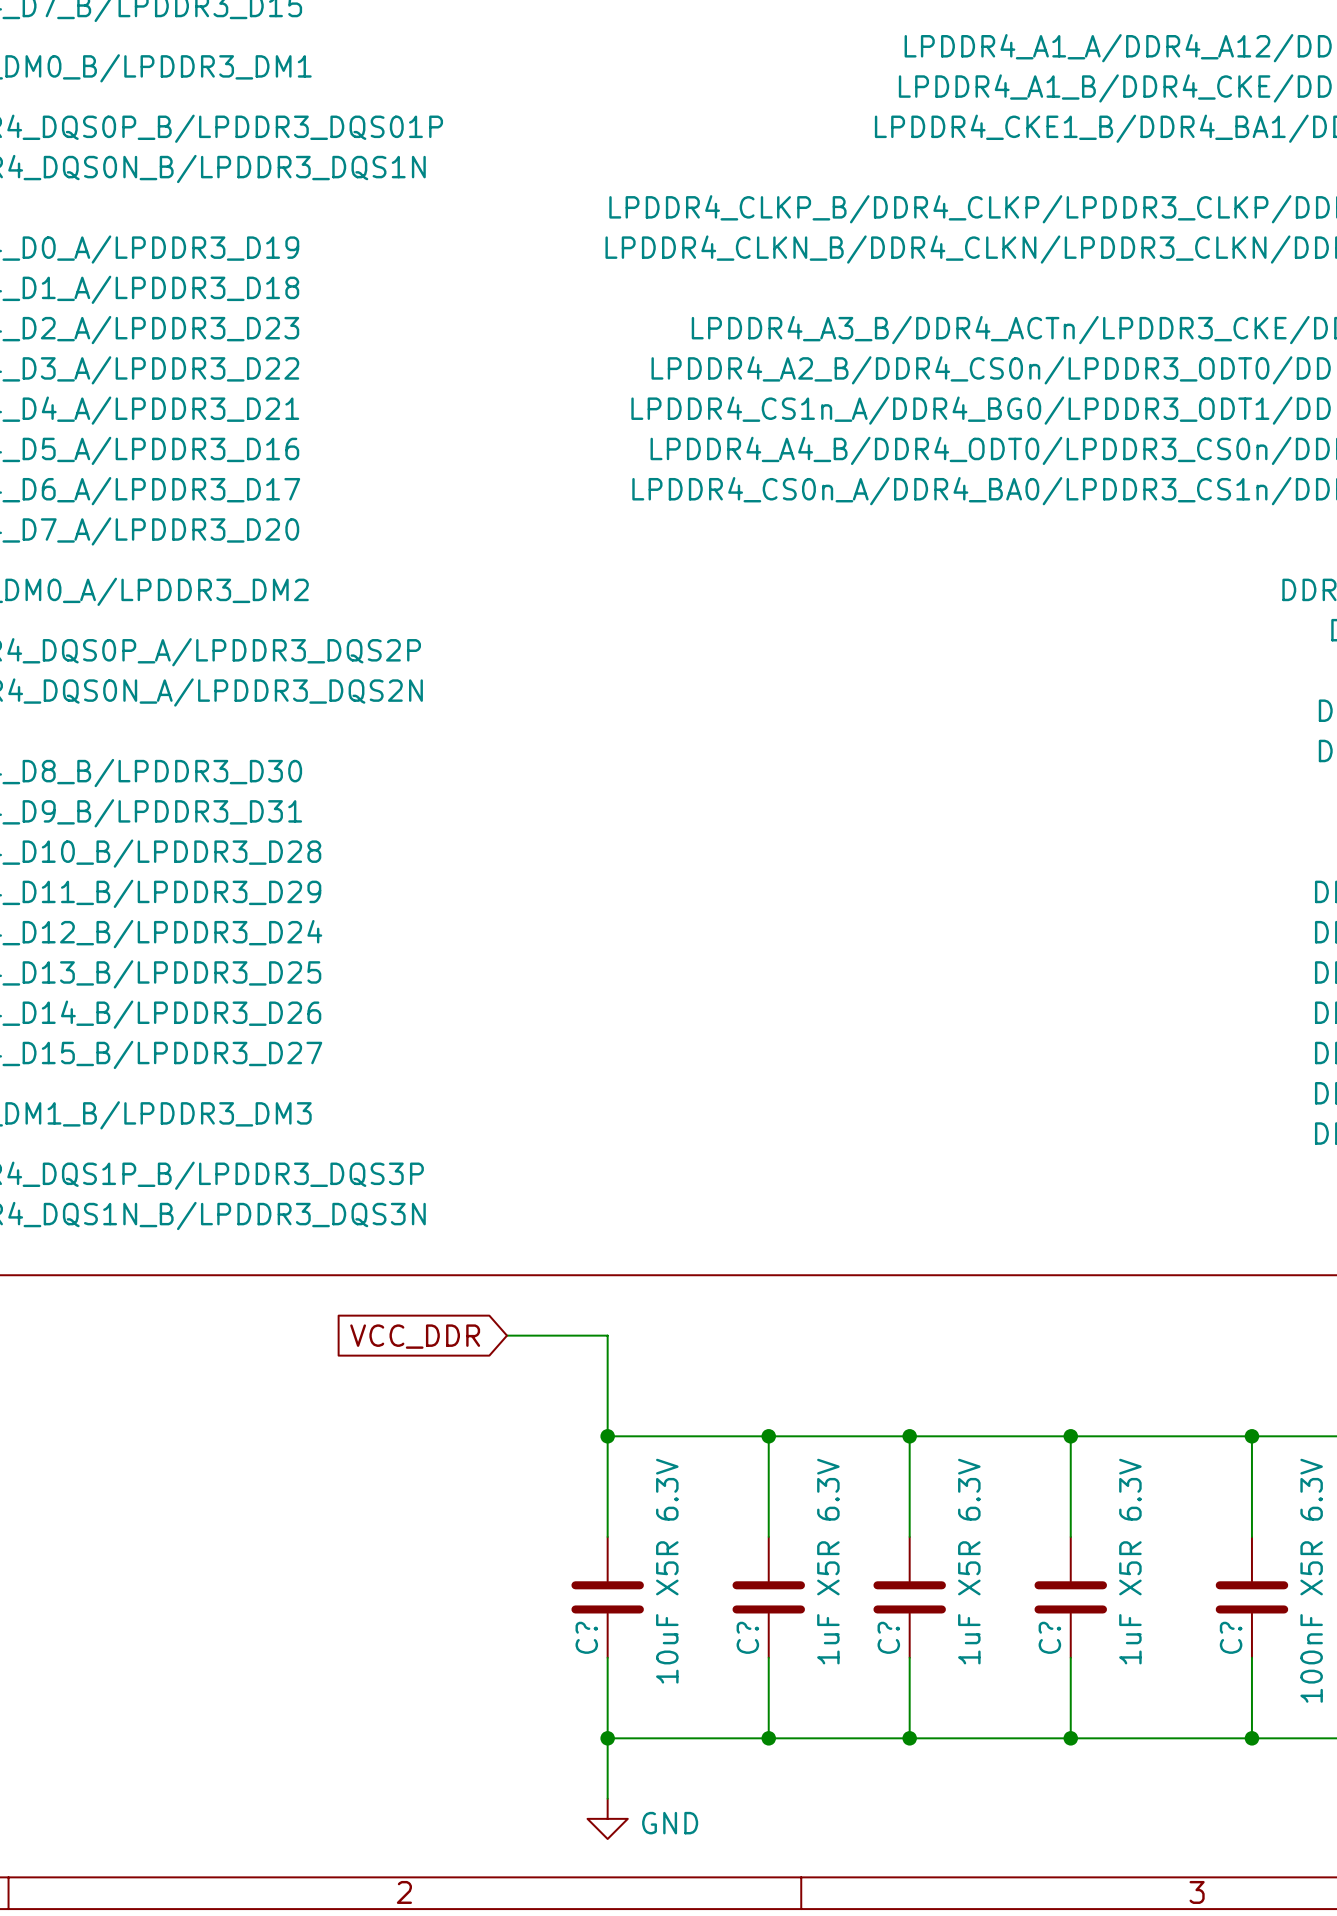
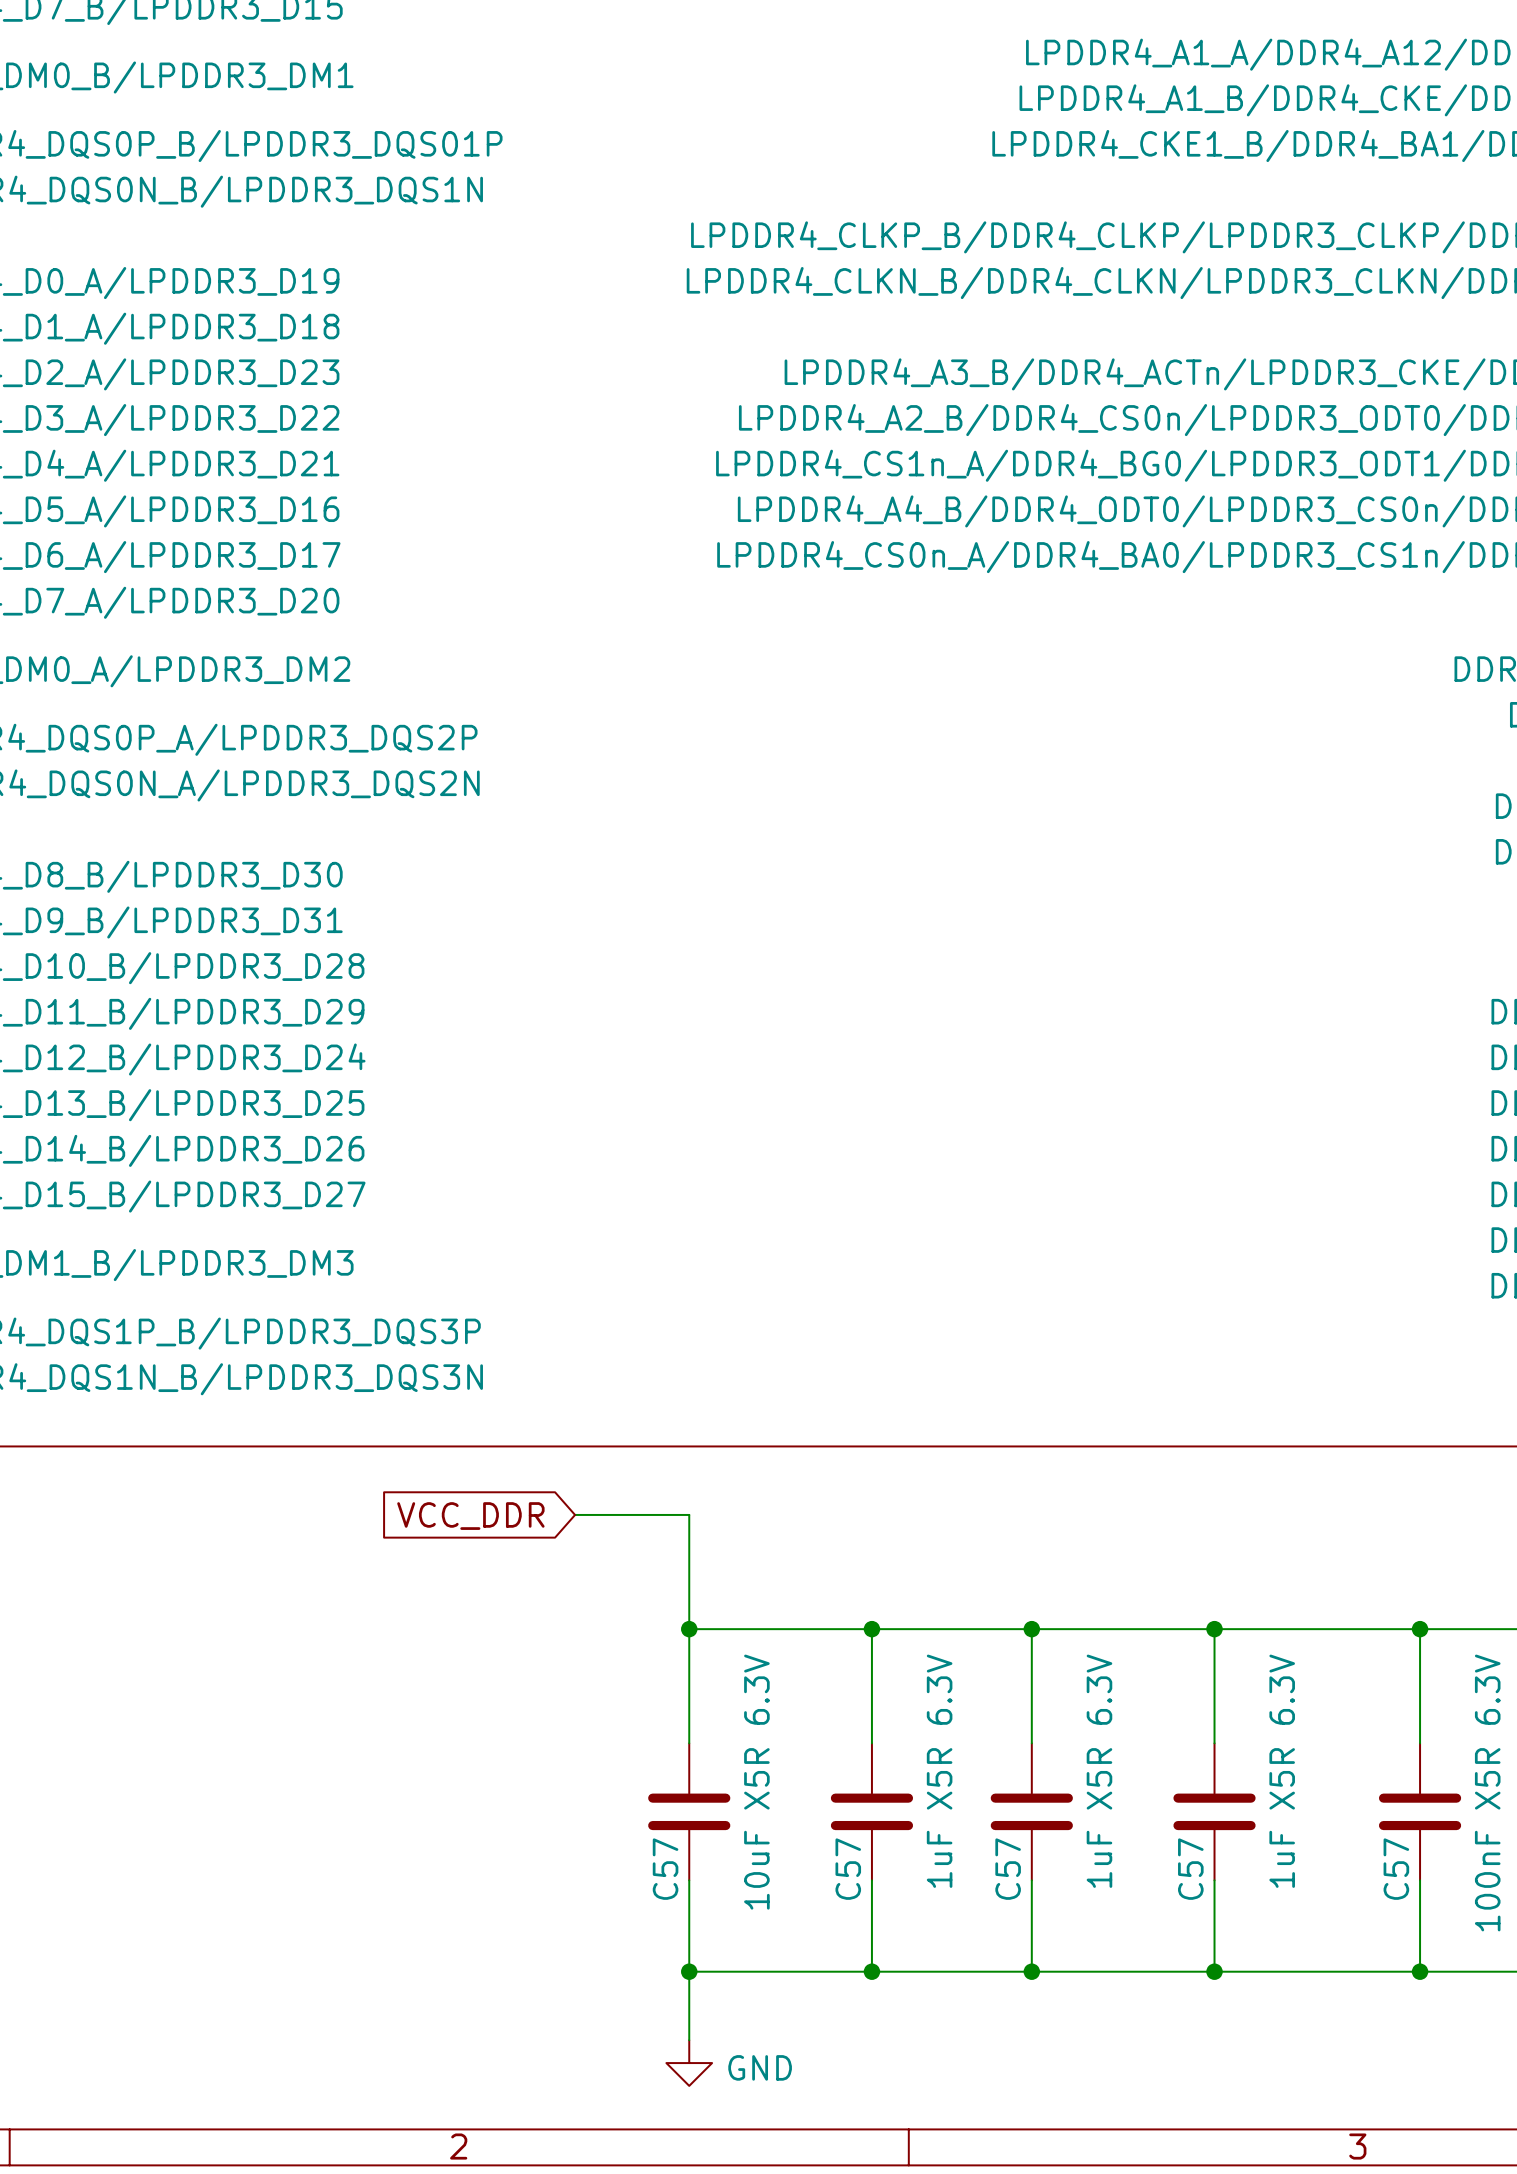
C? name: C? (586, 1637) -> C57 (665, 1869)
C? name: C? (747, 1637) -> C57 (848, 1869)
C? name: C? (888, 1637) -> C57 (1008, 1869)
C? name: C? (1049, 1637) -> C57 (1190, 1869)
C? name: C? (1231, 1637) -> C57 (1396, 1869)

